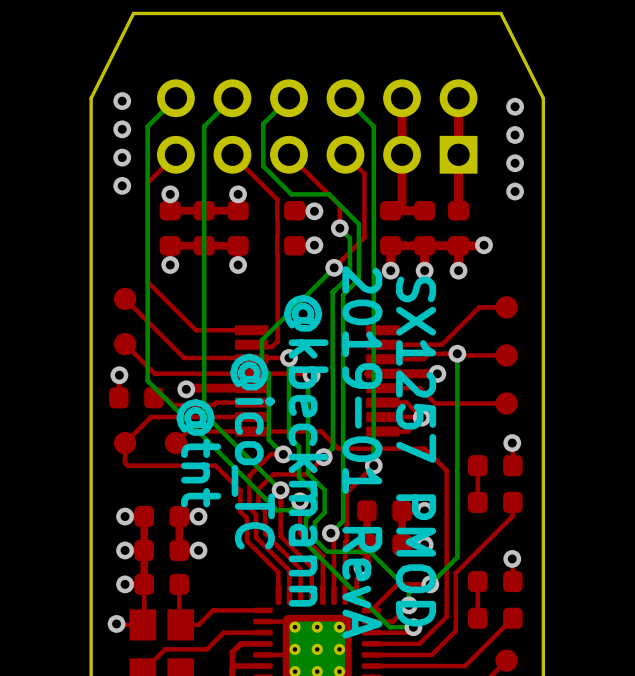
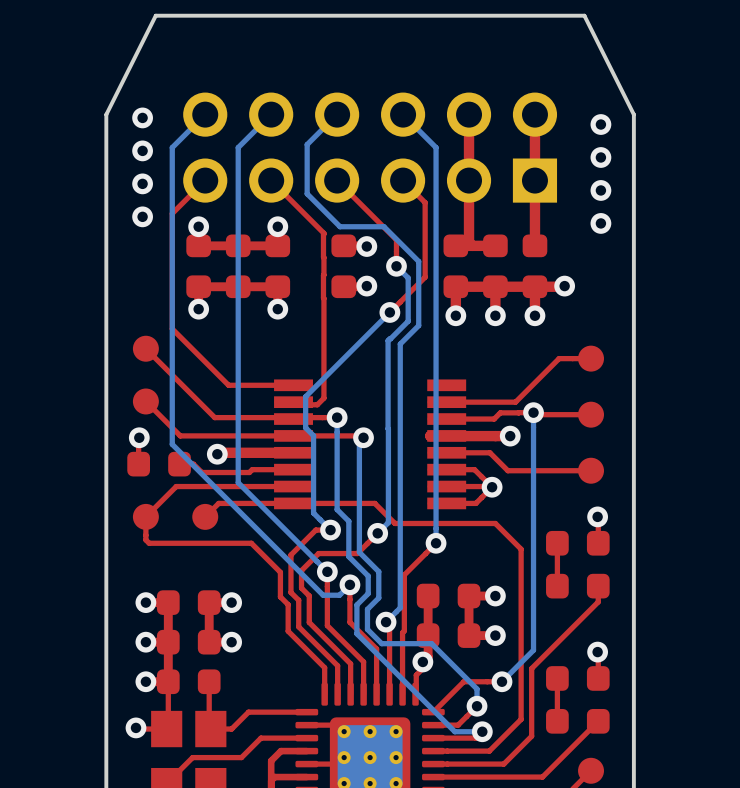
text: @kbeckmann (306, 450) -> none
text: @ico_TC (252, 451) -> none
text: SX1257 PMOD (416, 451) -> none
text: 2019-01 RevA (362, 452) -> none
text: @tnt (198, 453) -> none

